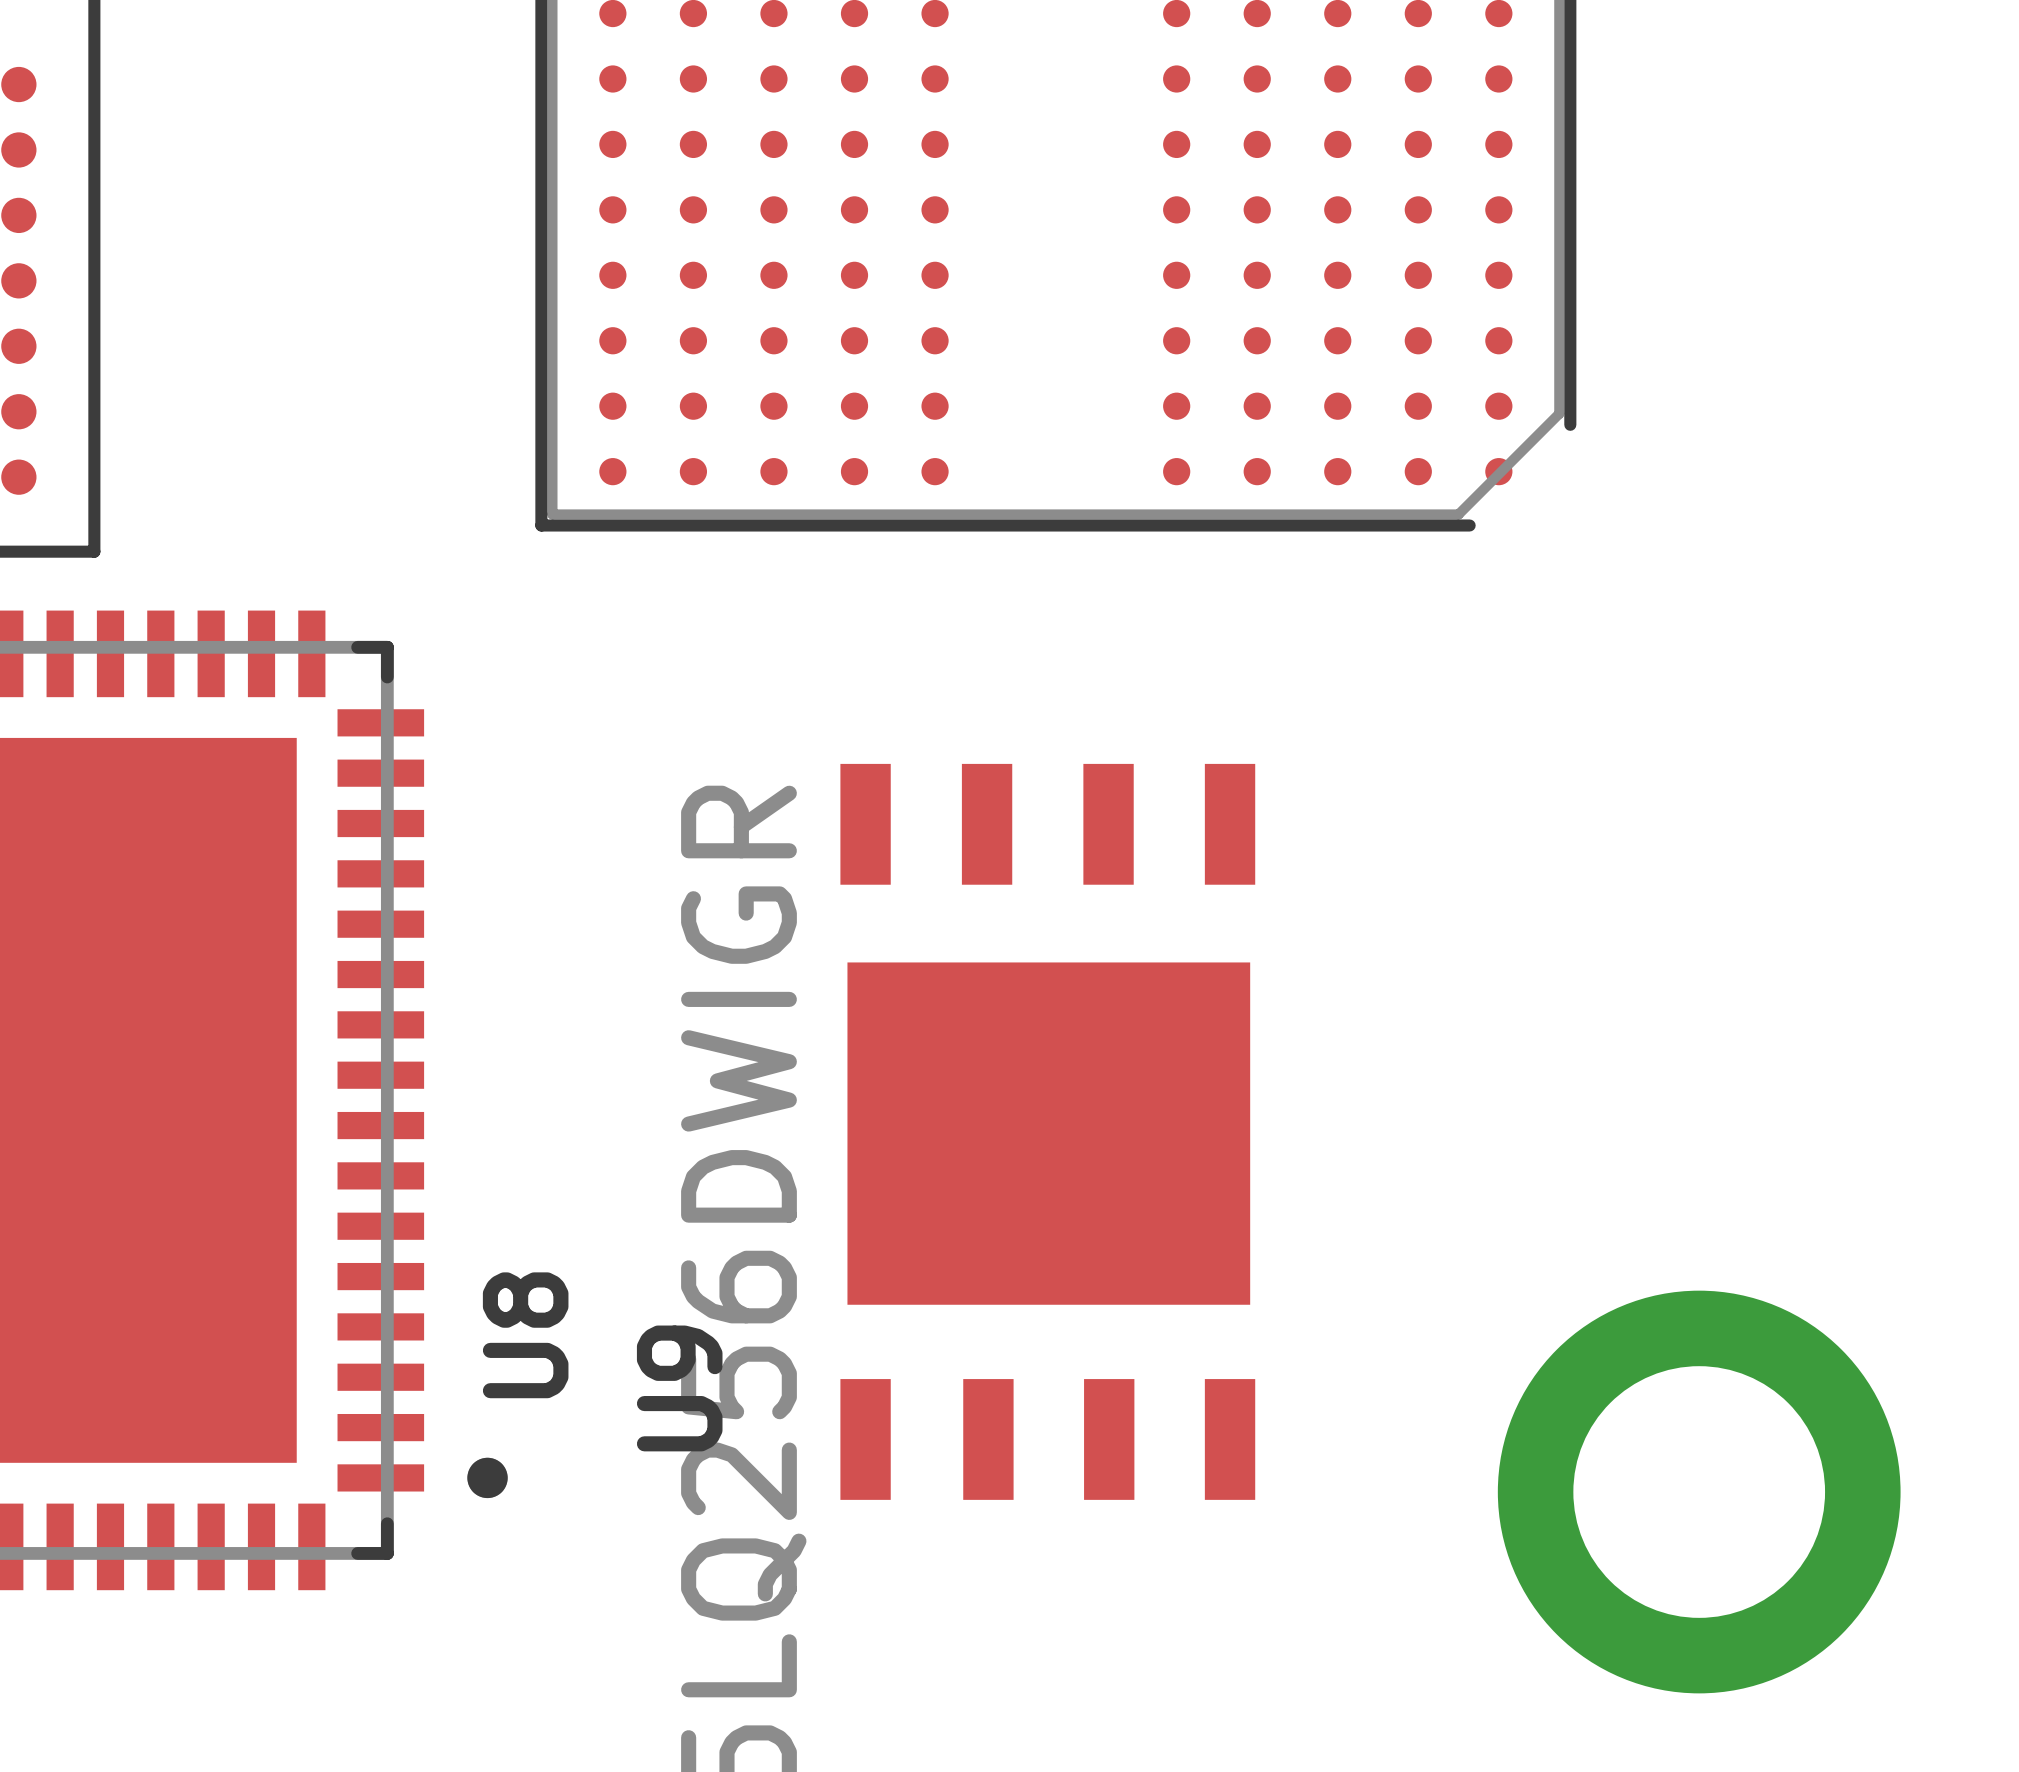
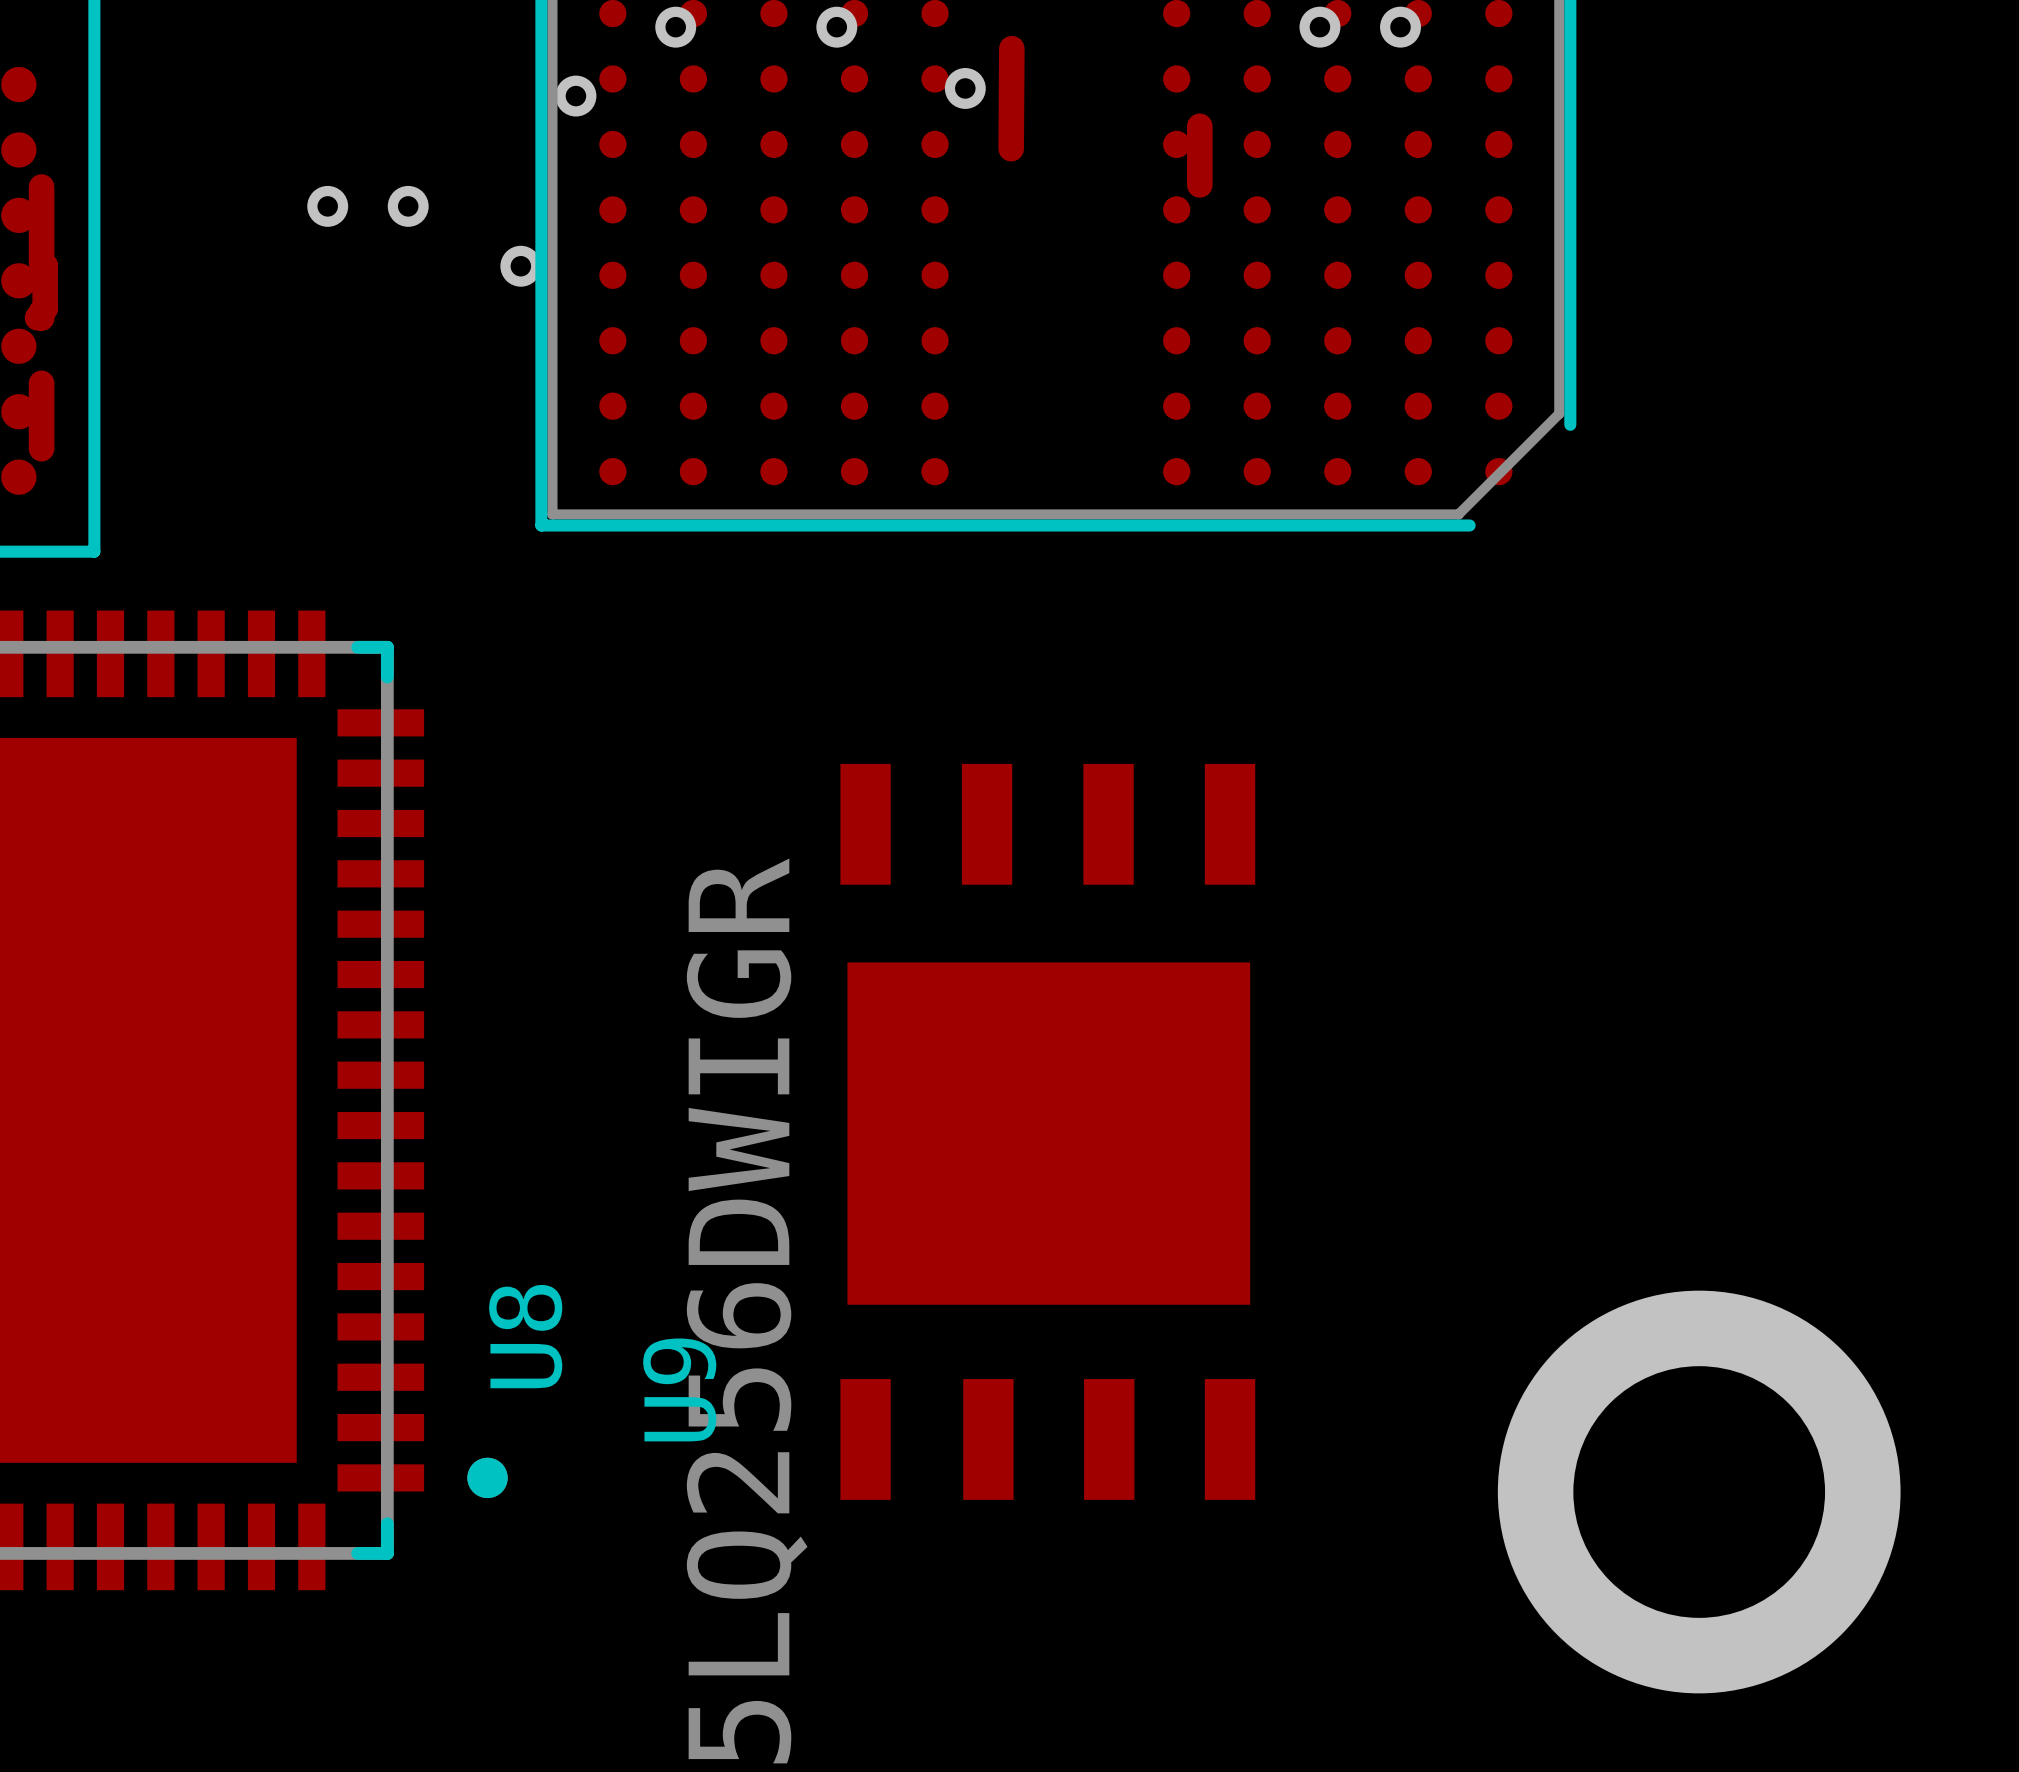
via: none -> (675, 27)
via: none -> (836, 27)
via: none -> (1319, 27)
via: none -> (1400, 27)
track: none -> (1011, 48) (1011, 148)
via: none -> (965, 88)
via: none -> (575, 96)
track: none -> (1199, 126) (1199, 184)
track: none -> (41, 186) (41, 262) (45, 265) (45, 308) (41, 312) (41, 317) (37, 317)
via: none -> (327, 206)
via: none -> (408, 206)
via: none -> (520, 266)
track: none -> (41, 383) (41, 448)

